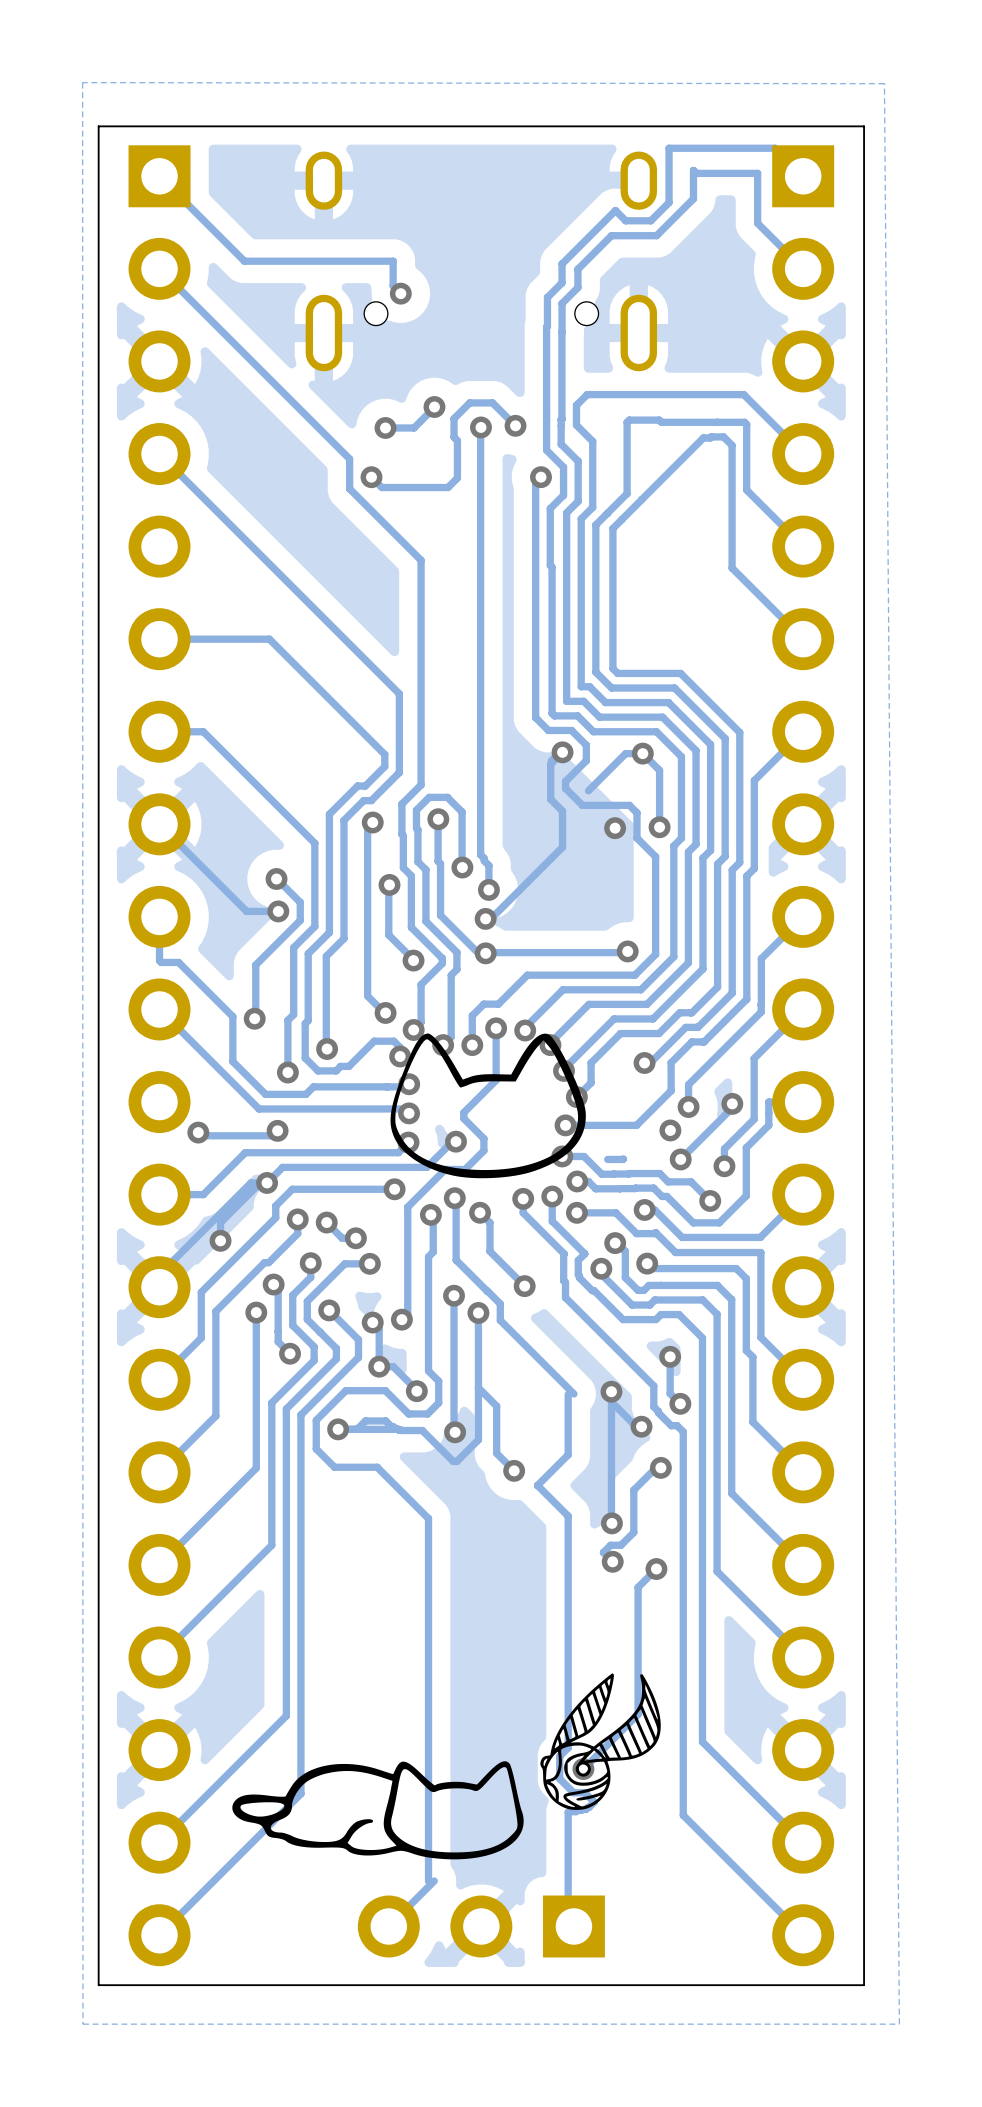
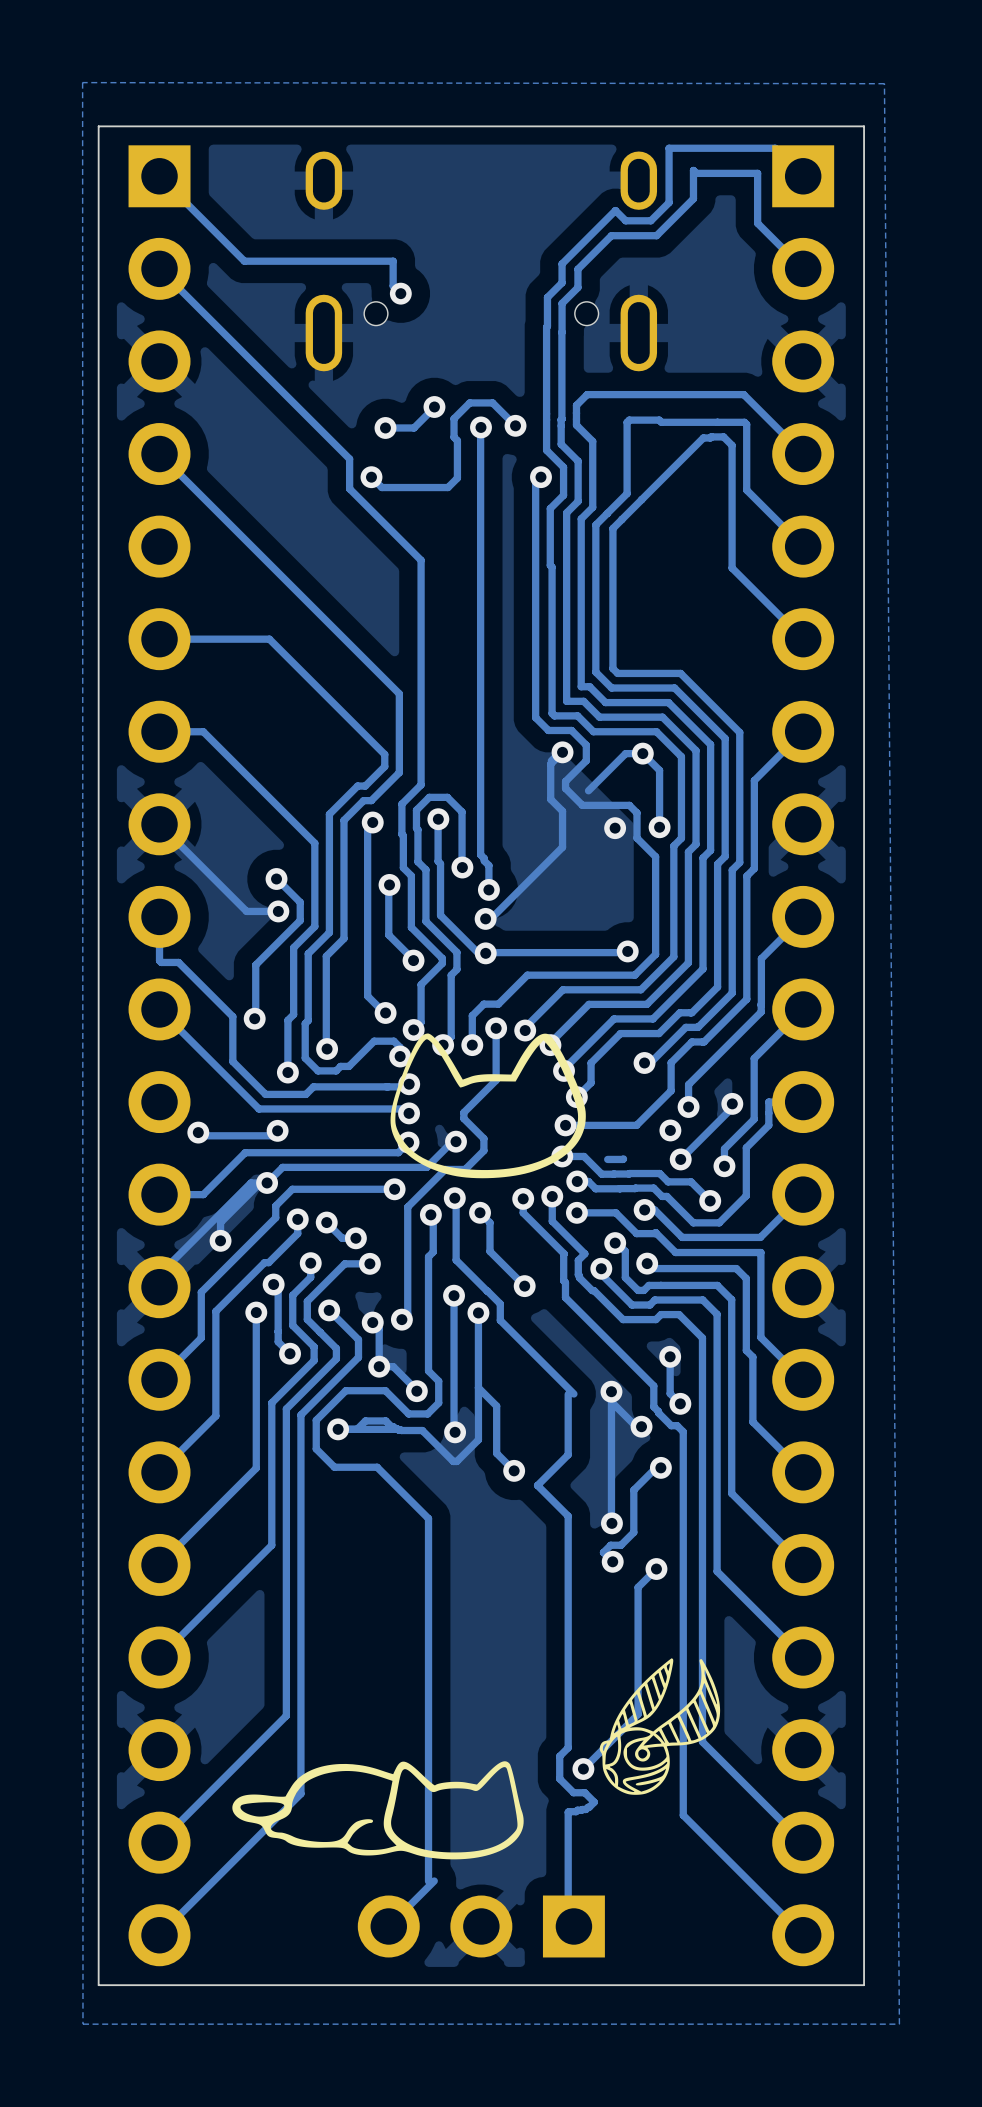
drawing position: (600, 1741) -> (659, 1726)

